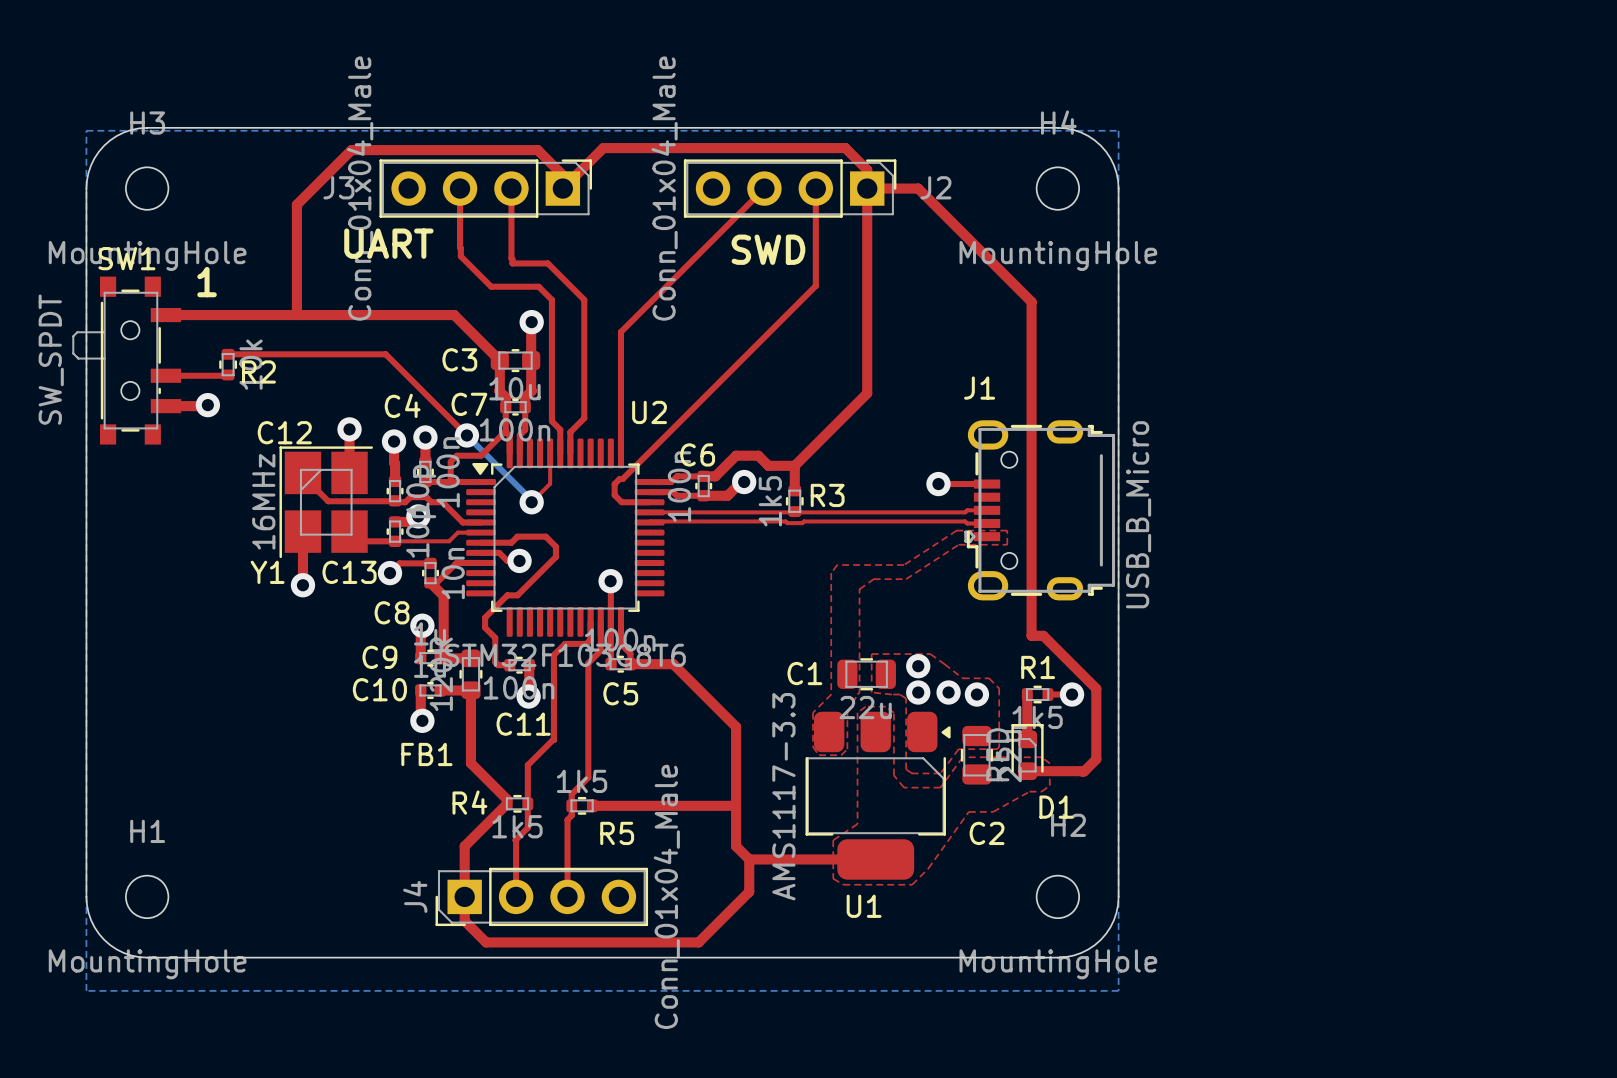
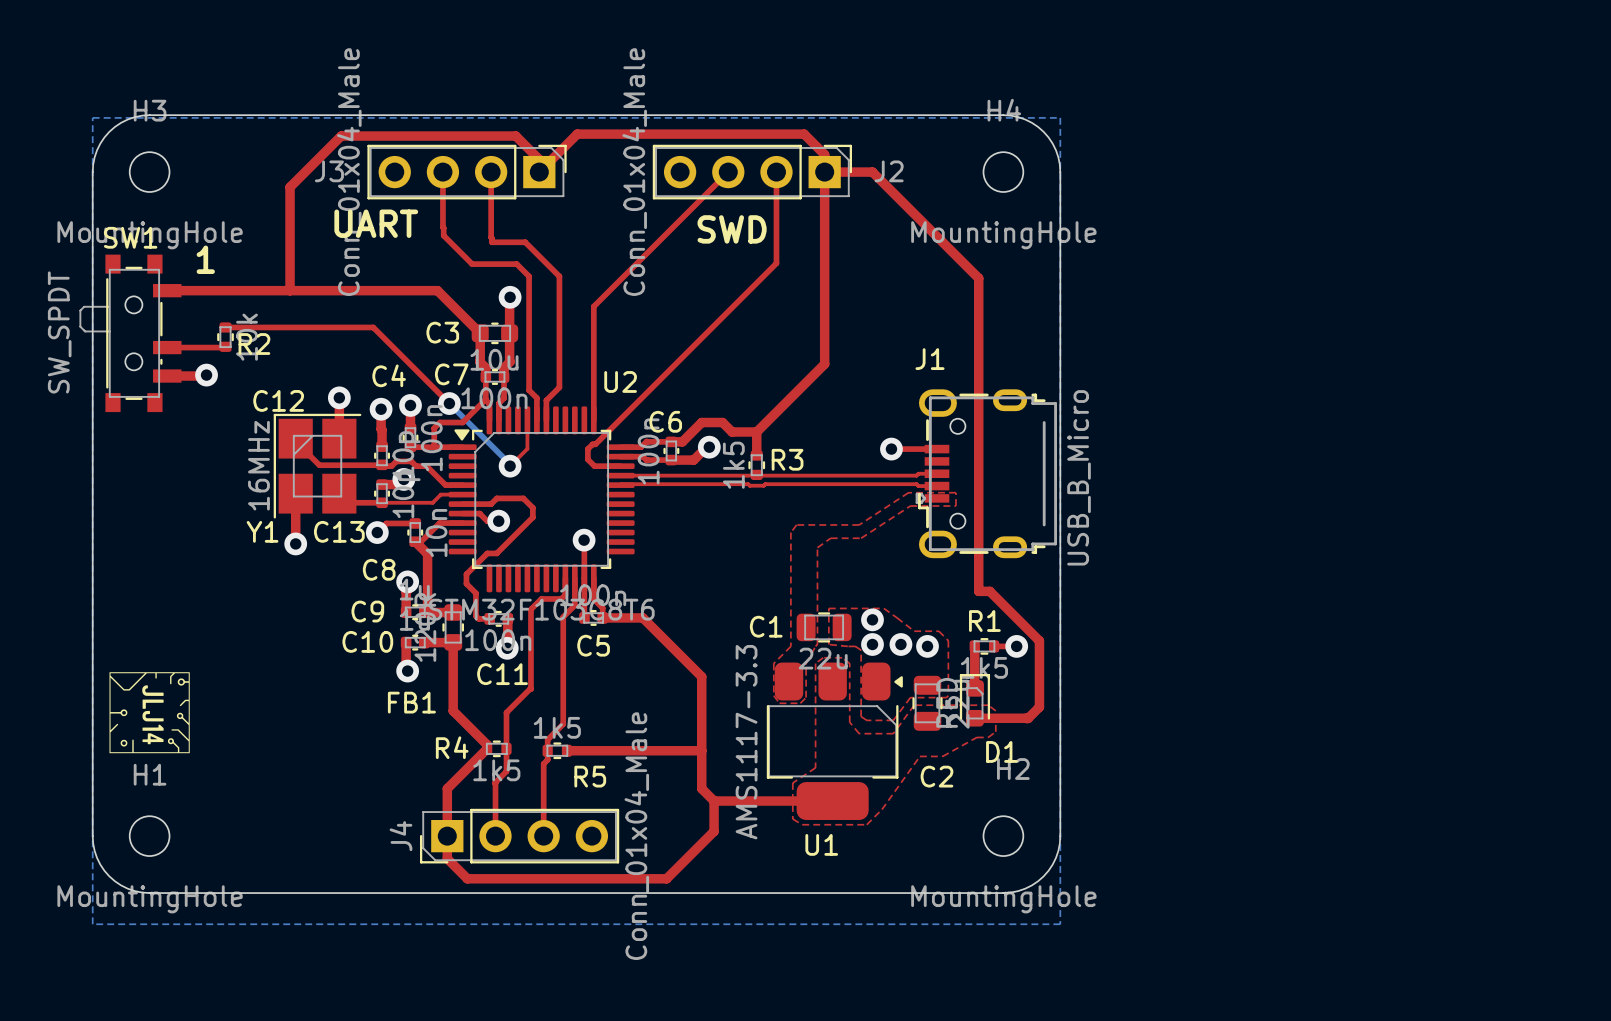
drawing: none -> [109, 672, 190, 754]

